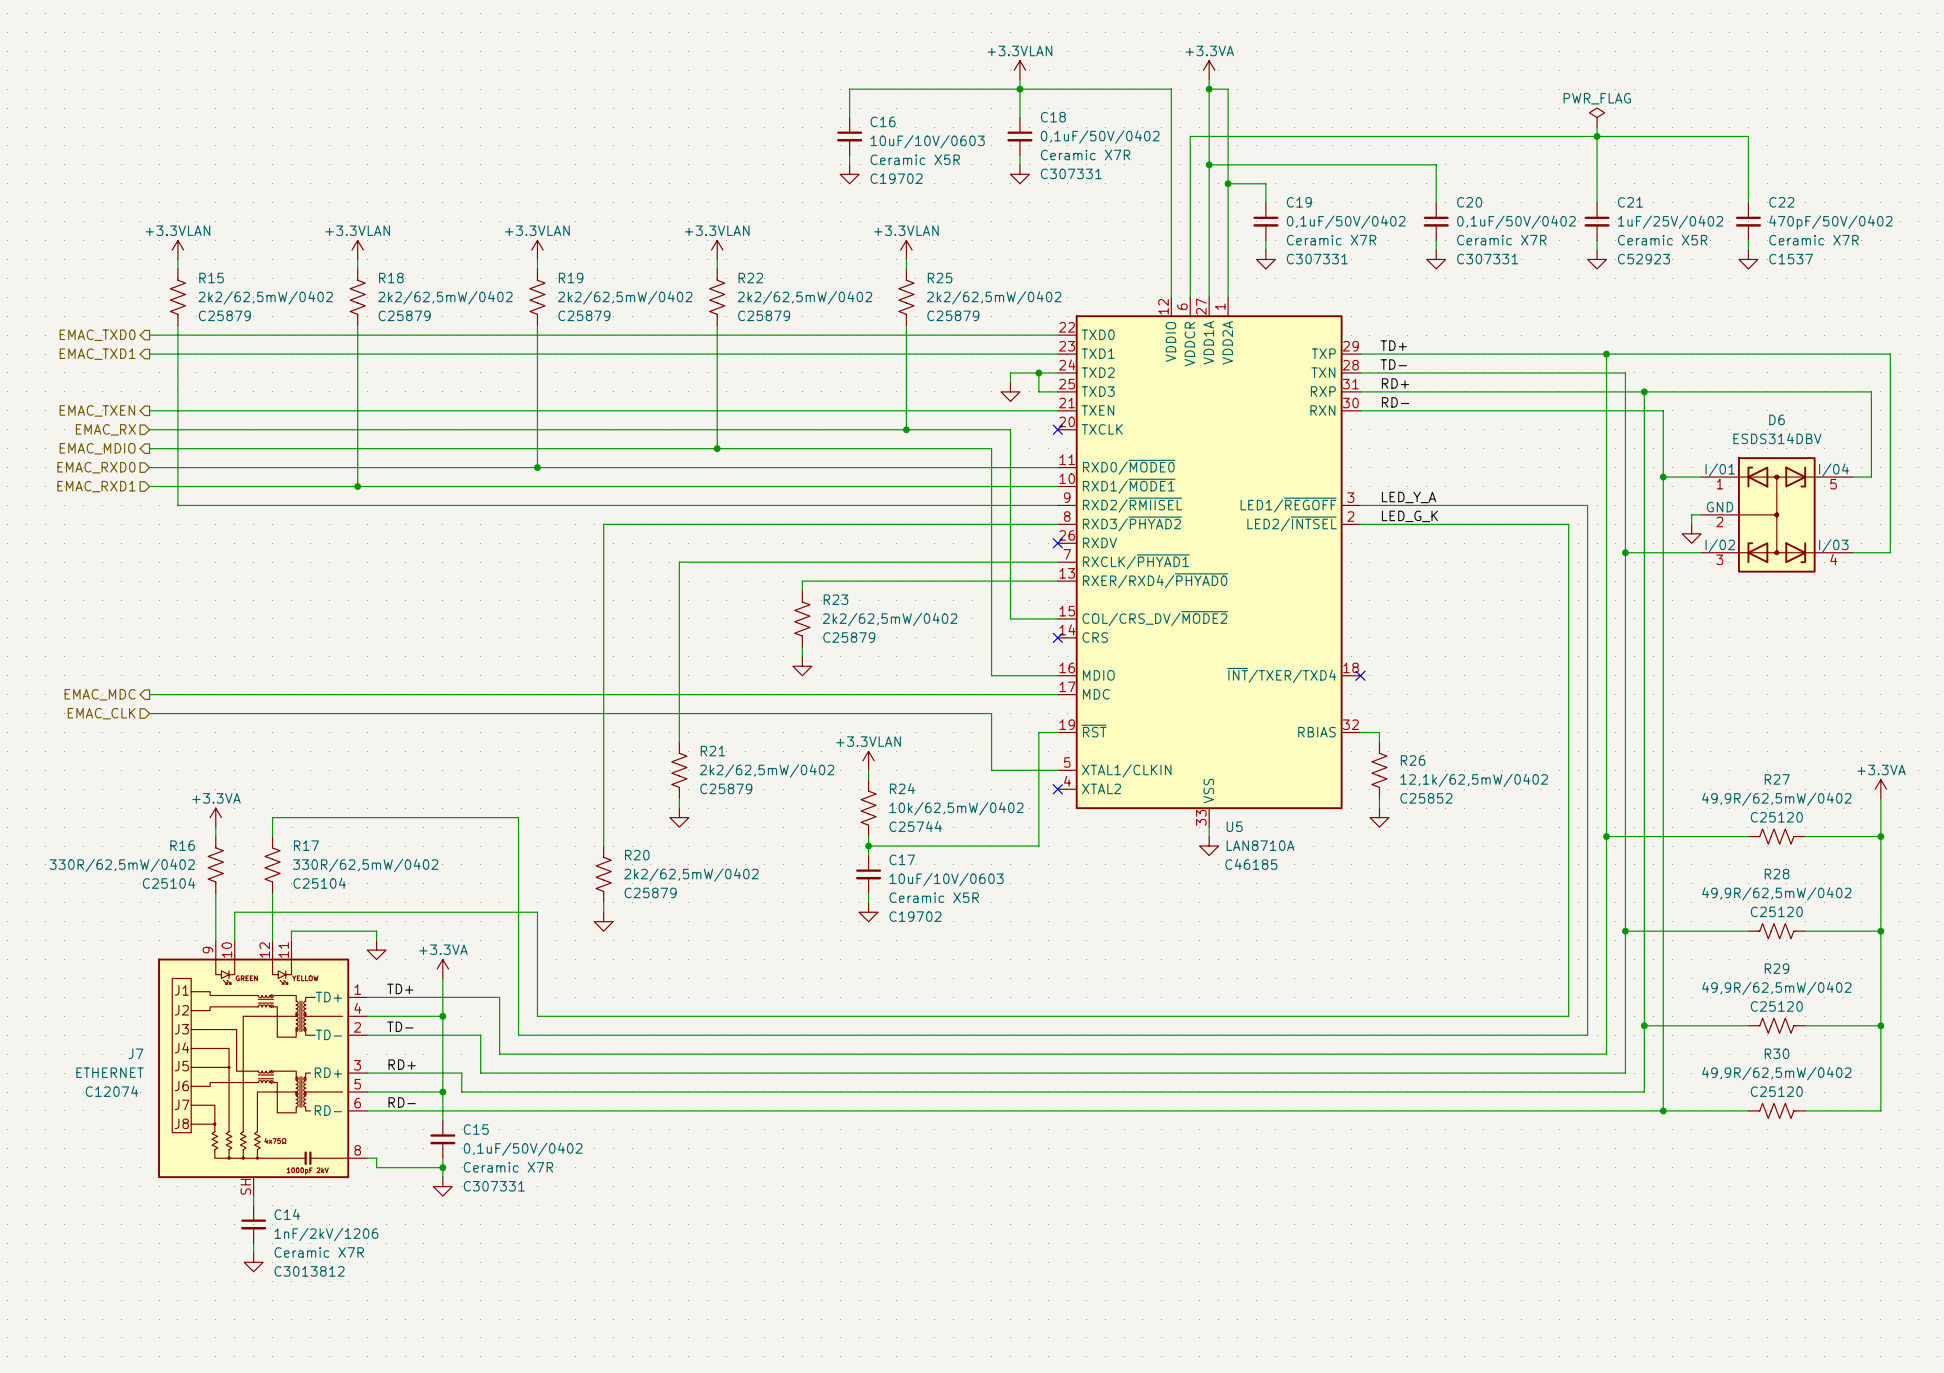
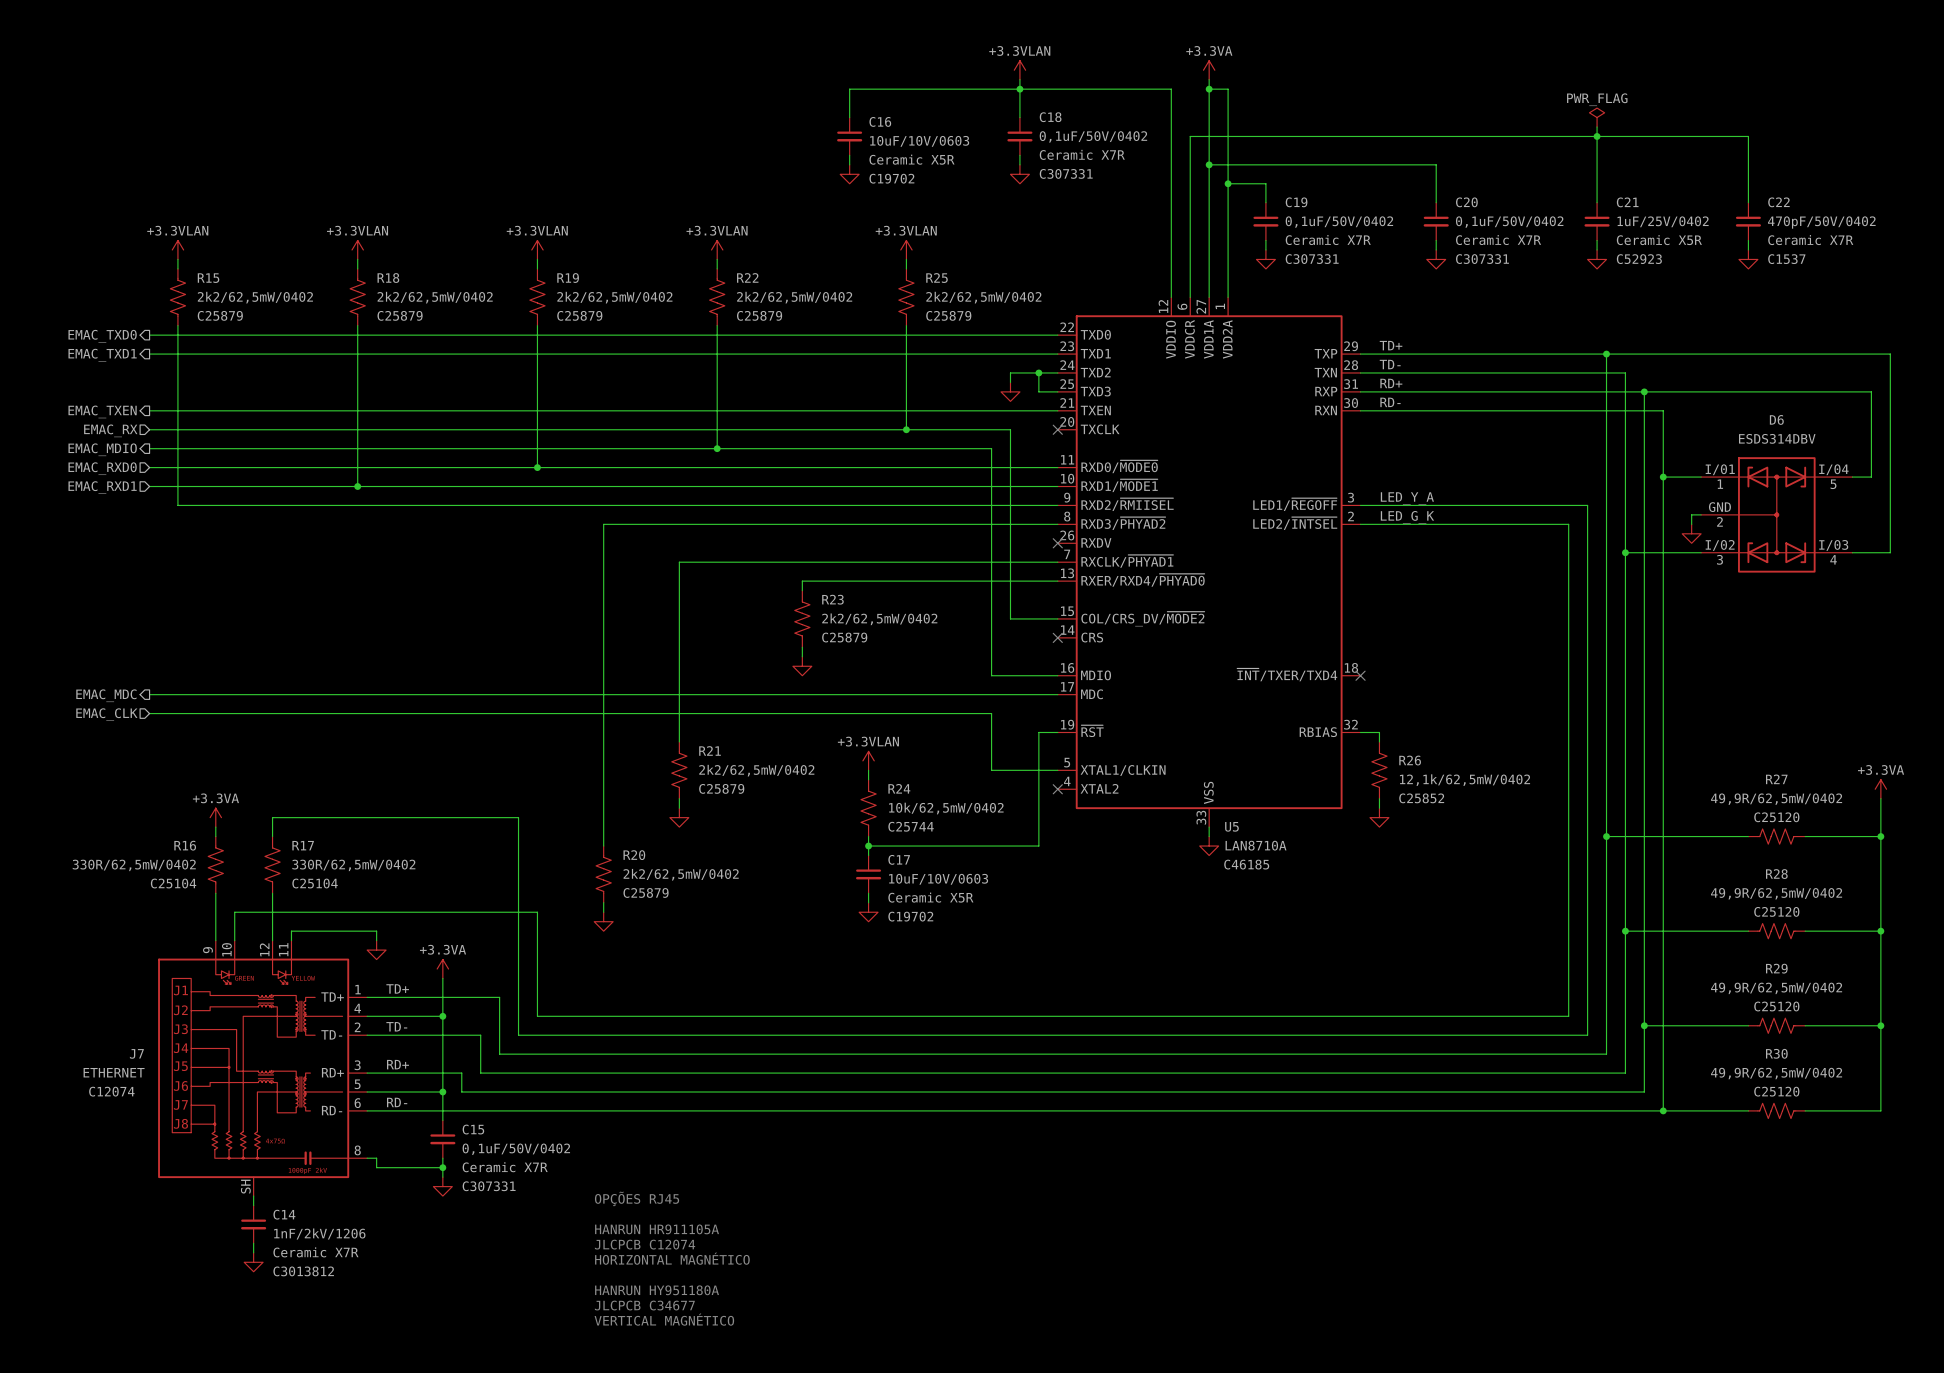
text: none -> OPÇÕES RJ45 (637, 1198)
text: none -> HANRUN HR911105A (657, 1229)
text: none -> JLCPCB C12074 (645, 1244)
text: none -> HORIZONTAL MAGNÉTICO (672, 1258)
text: none -> HANRUN HY951180A (657, 1290)
text: none -> JLCPCB C34677 (644, 1305)
text: none -> VERTICAL MAGNÉTICO (664, 1319)

